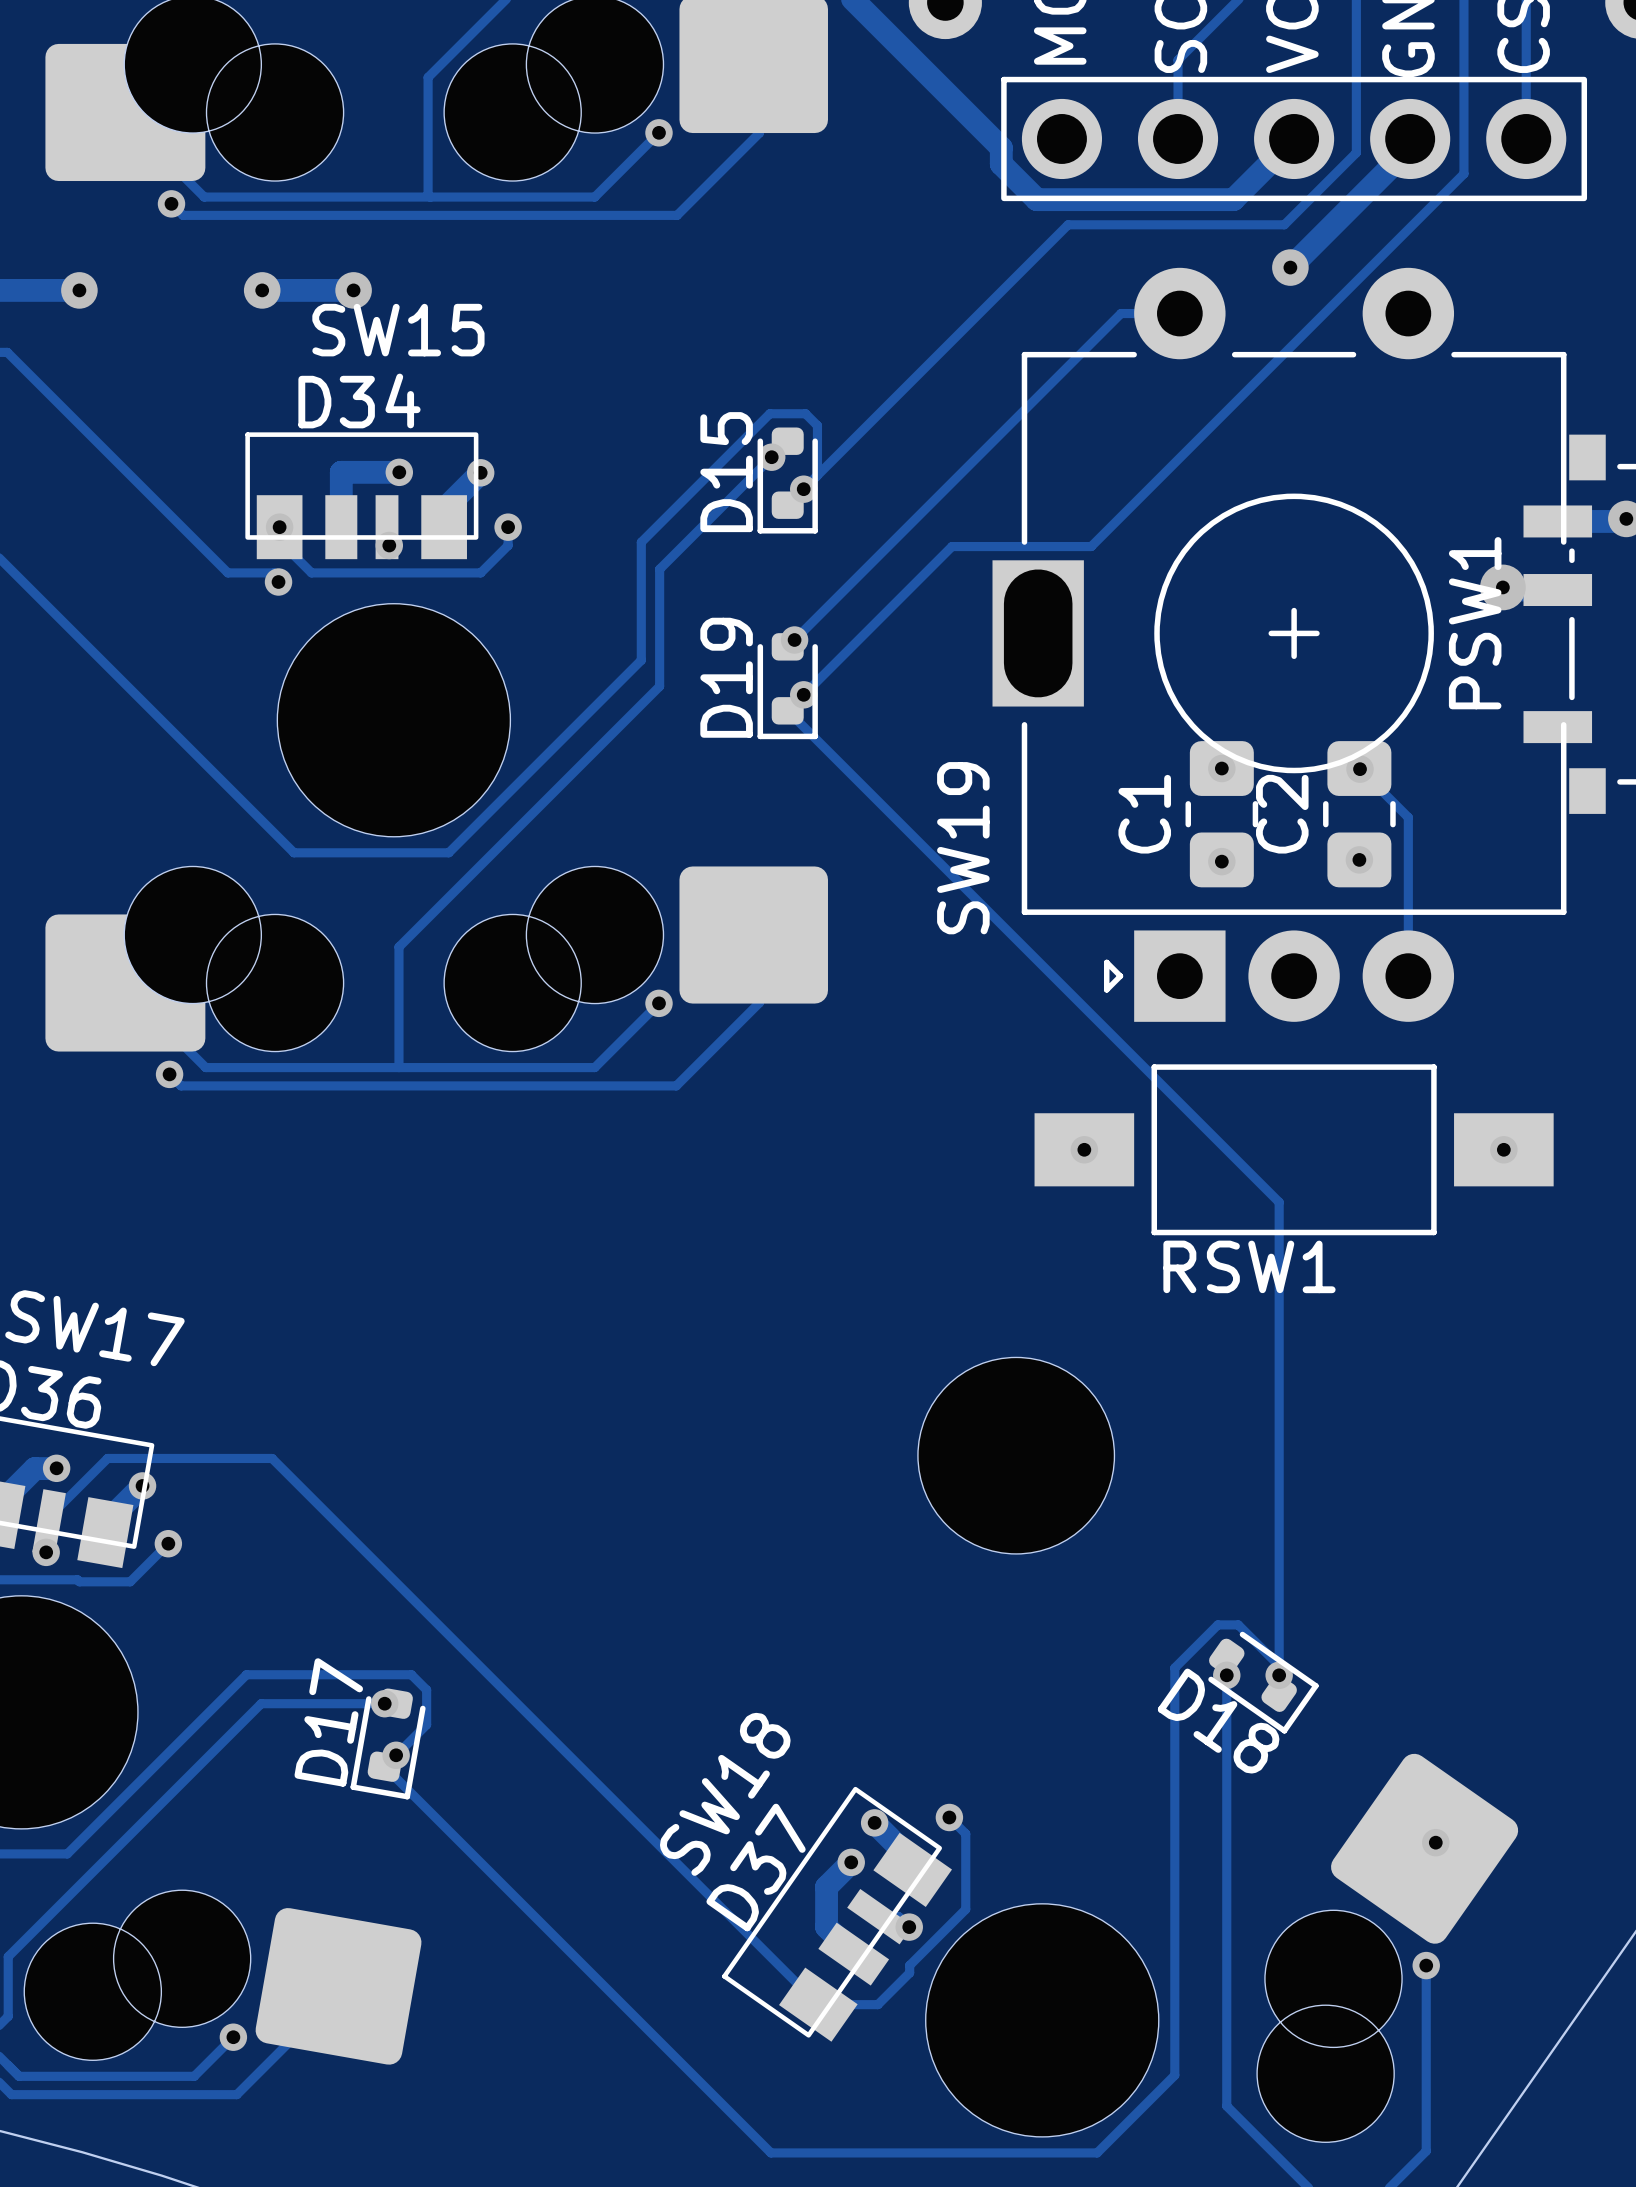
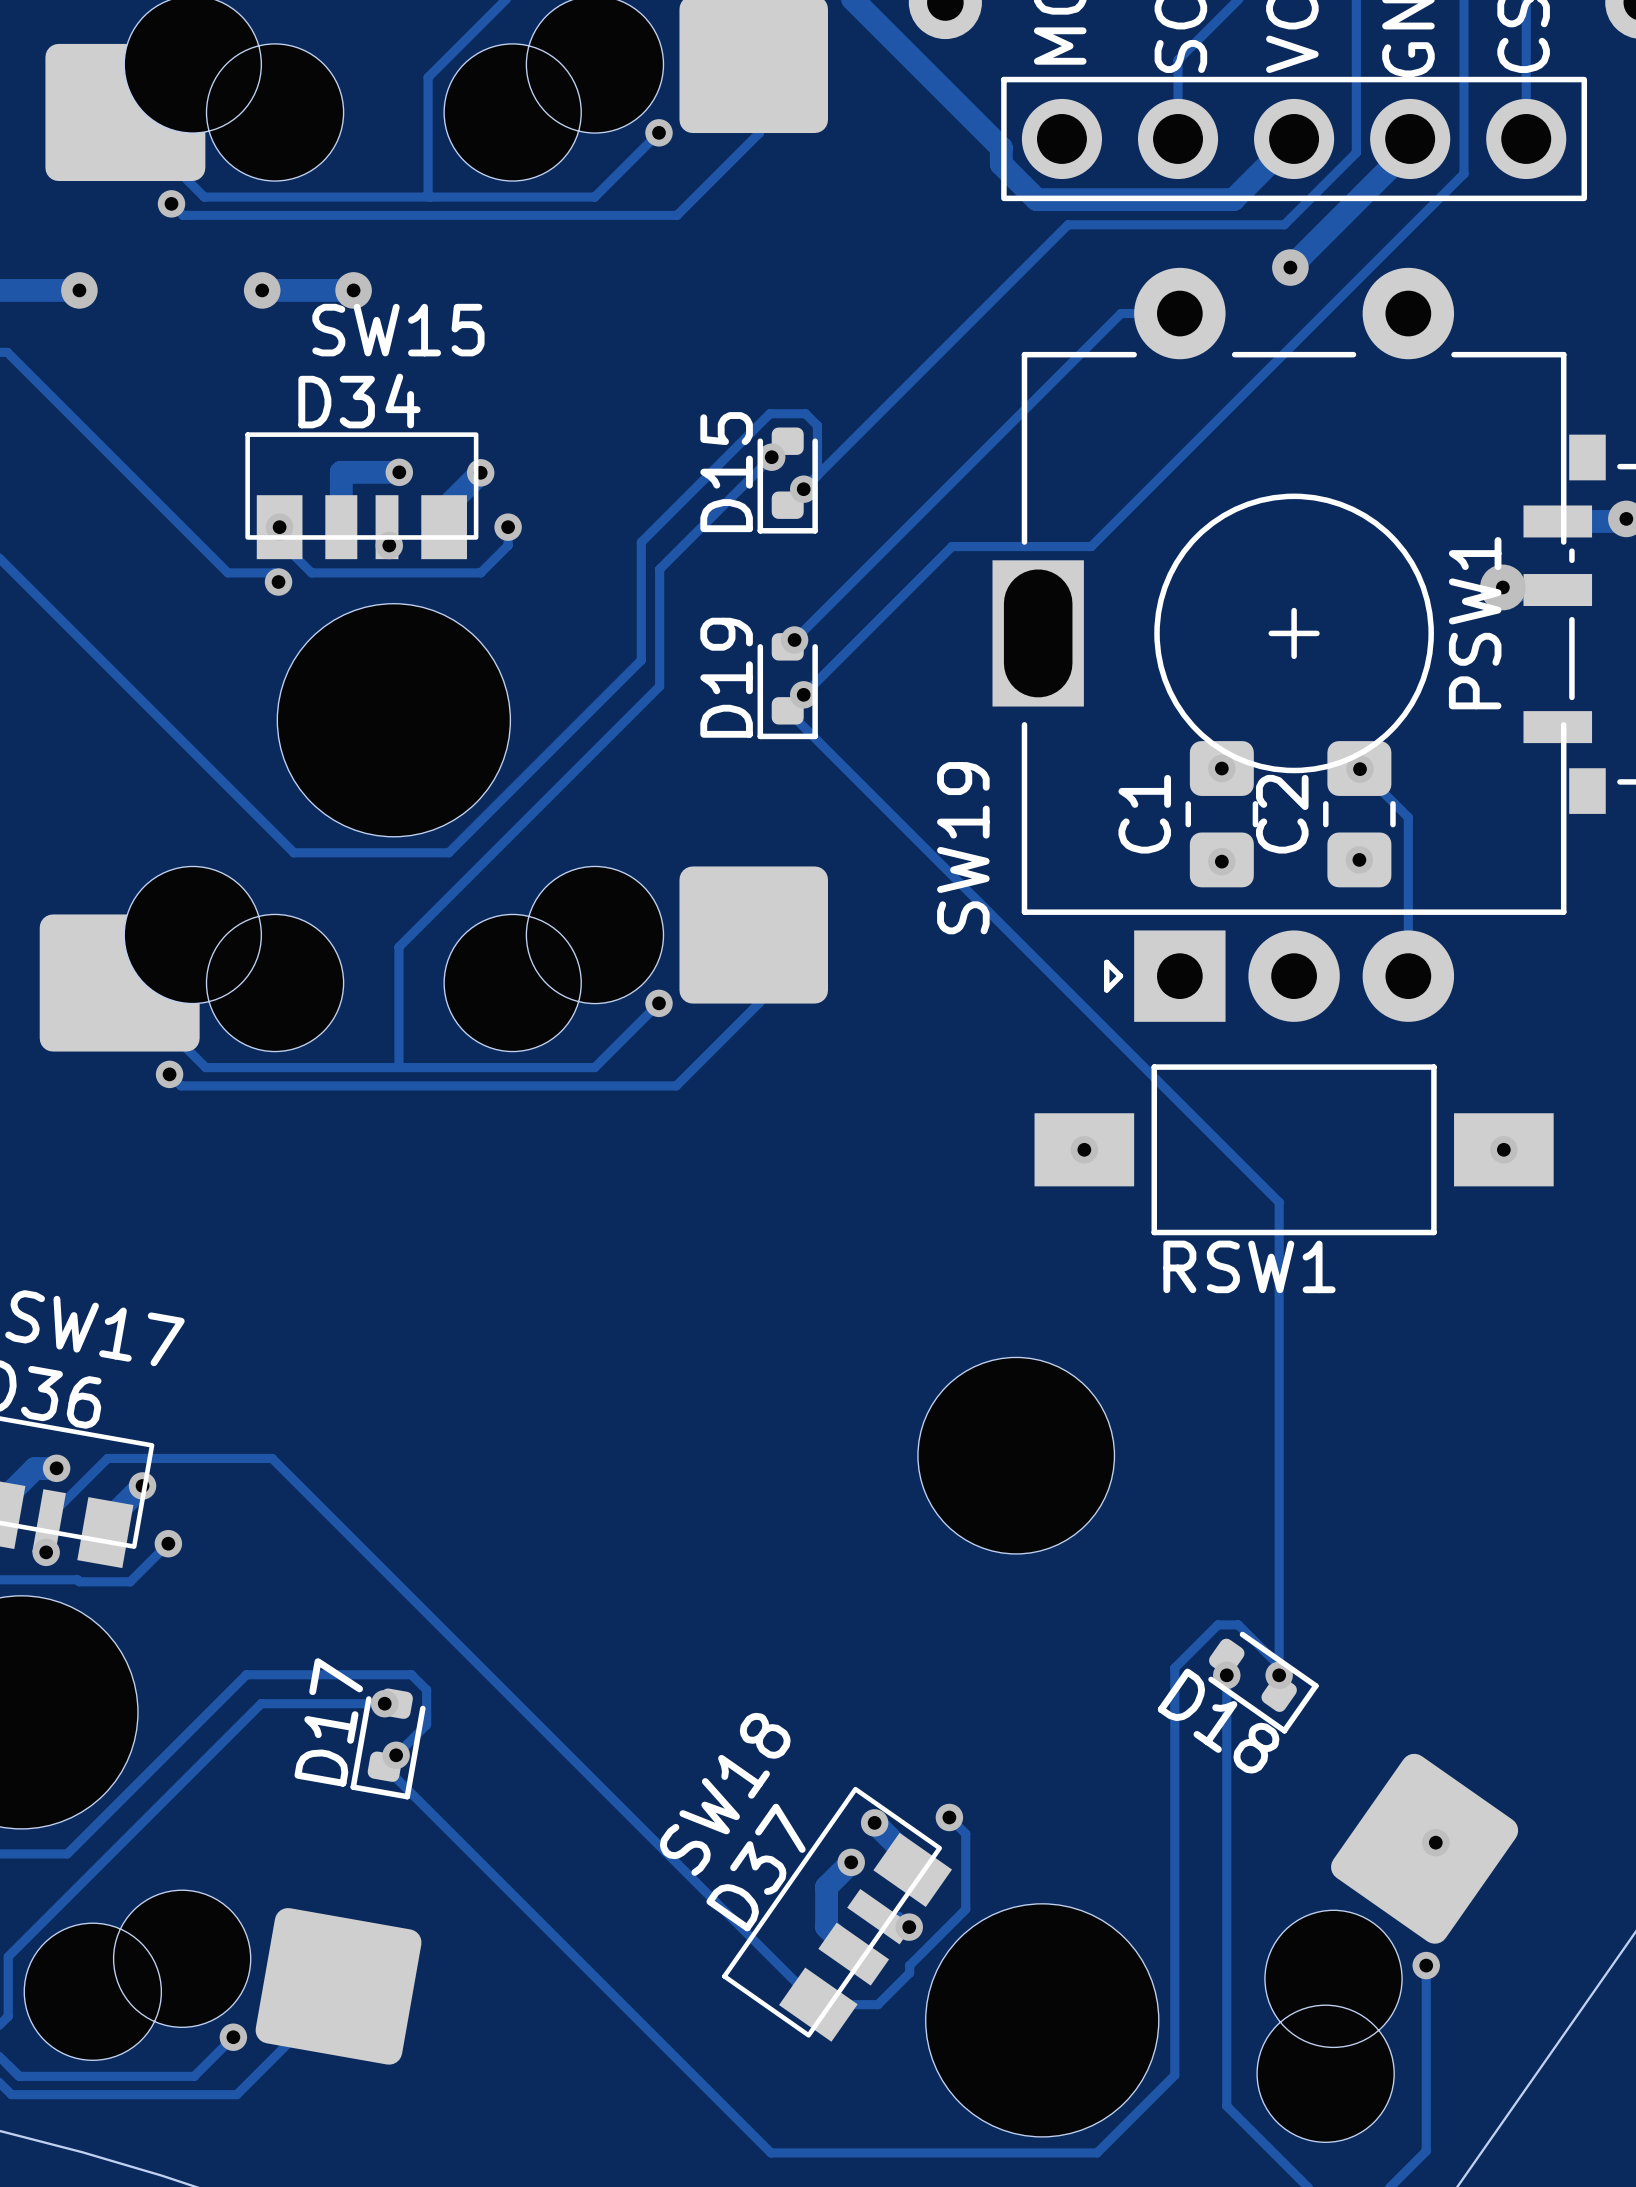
SW15 footprint: [45, 432, 828, 1052] -> [39, 432, 828, 1052]

